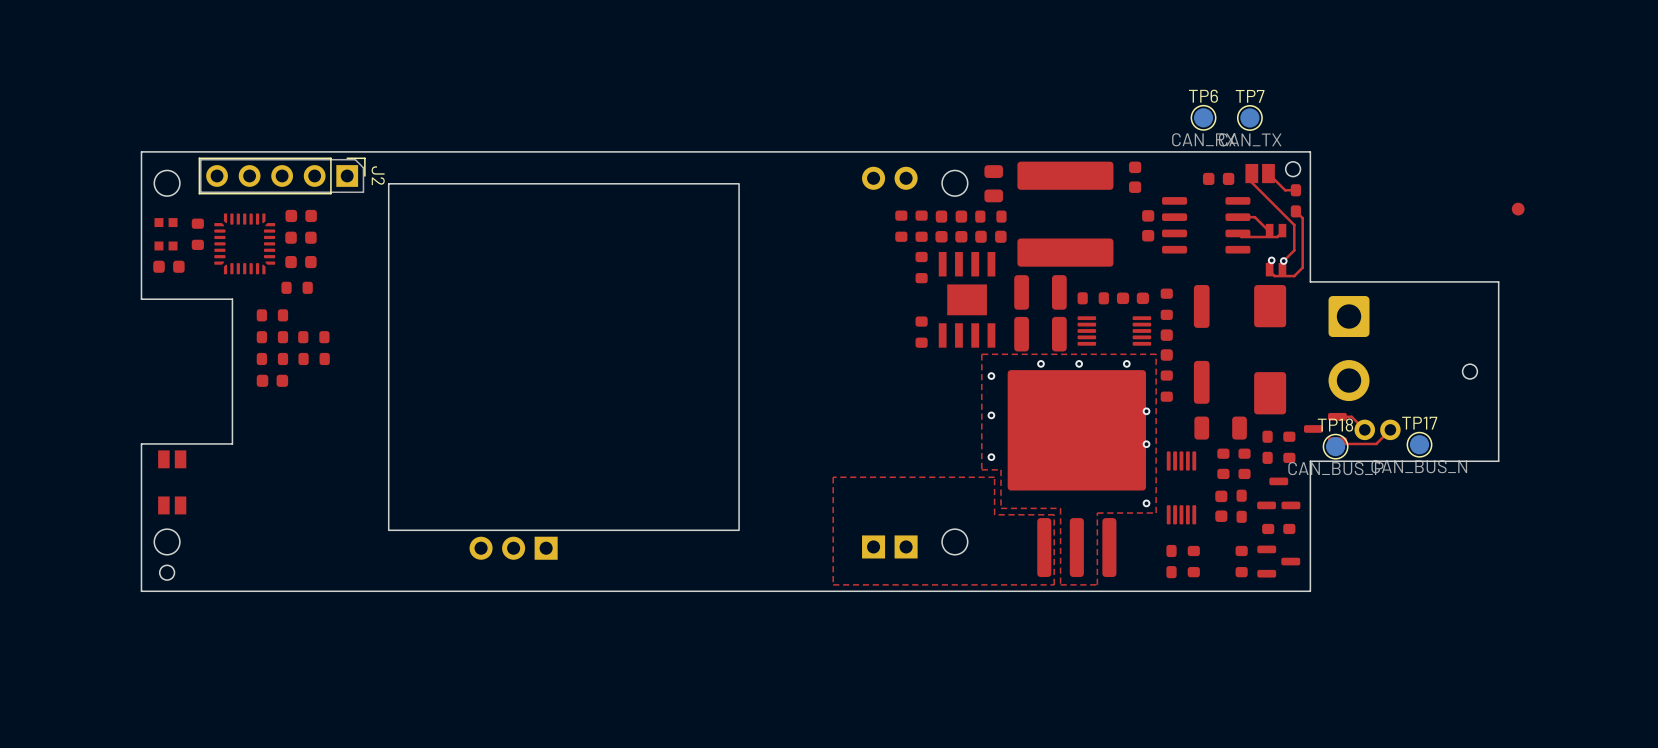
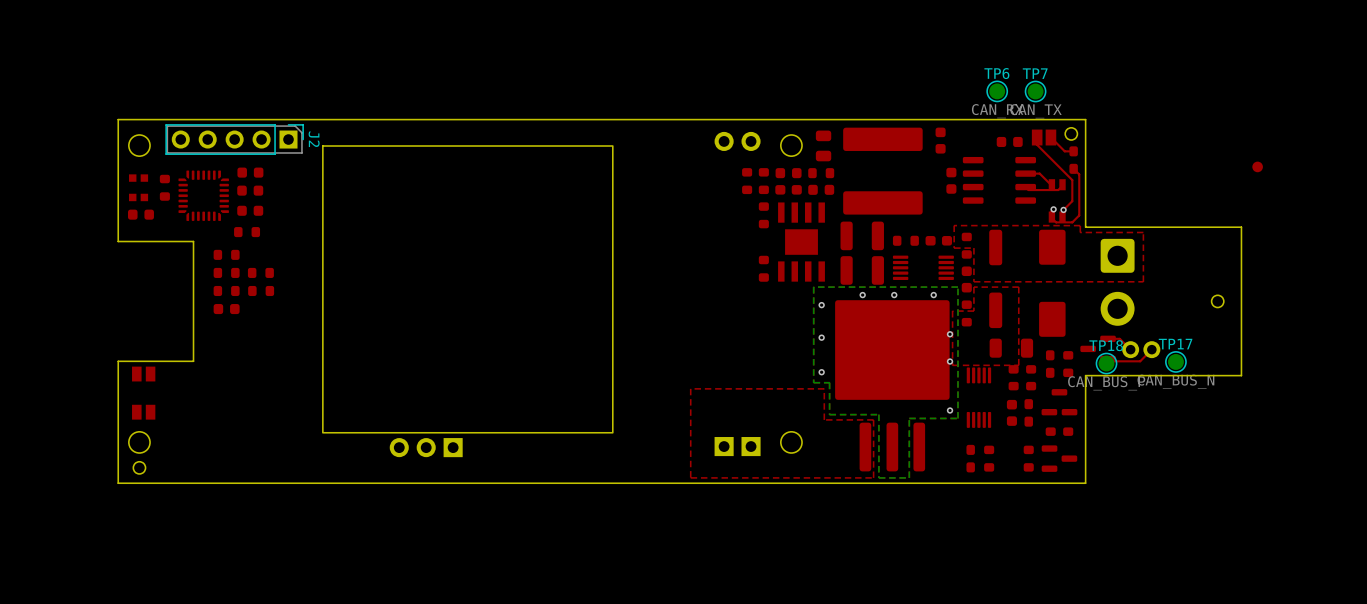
top zone outline: none -> (1080, 225) (1080, 232) (1143, 232) (1143, 281) (973, 281) (973, 248) (954, 248) (954, 225) (1080, 225)
bottom zone outline: none -> (957, 287) (813, 287) (813, 382) (829, 382) (829, 414) (878, 414) (878, 477) (909, 477) (909, 418) (957, 418) (957, 287)
top zone outline: none -> (1018, 287) (973, 287) (973, 311) (952, 311) (952, 365) (1018, 365) (1018, 287)

